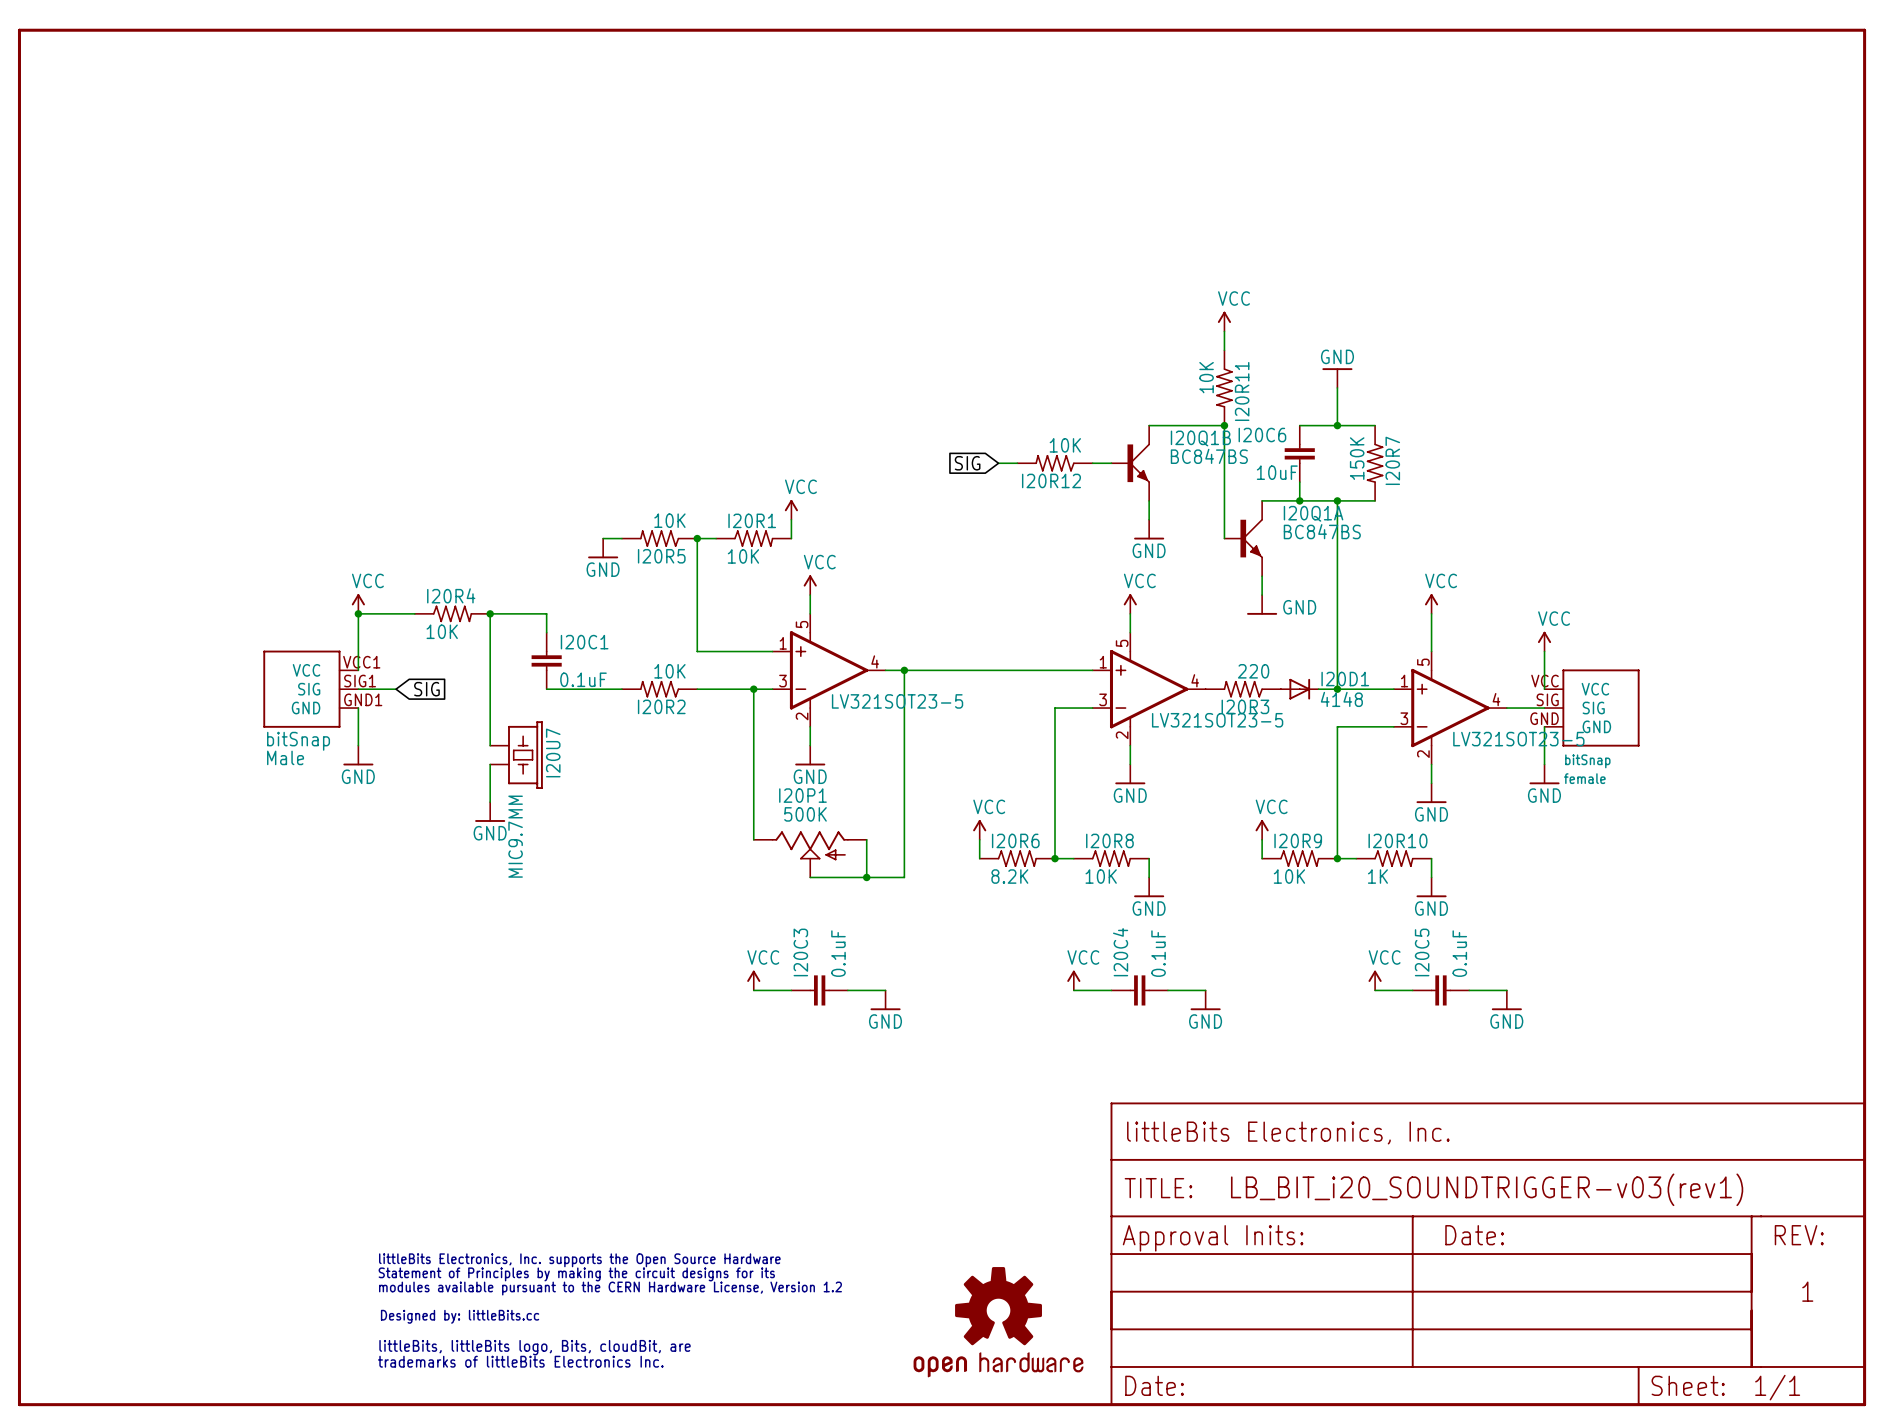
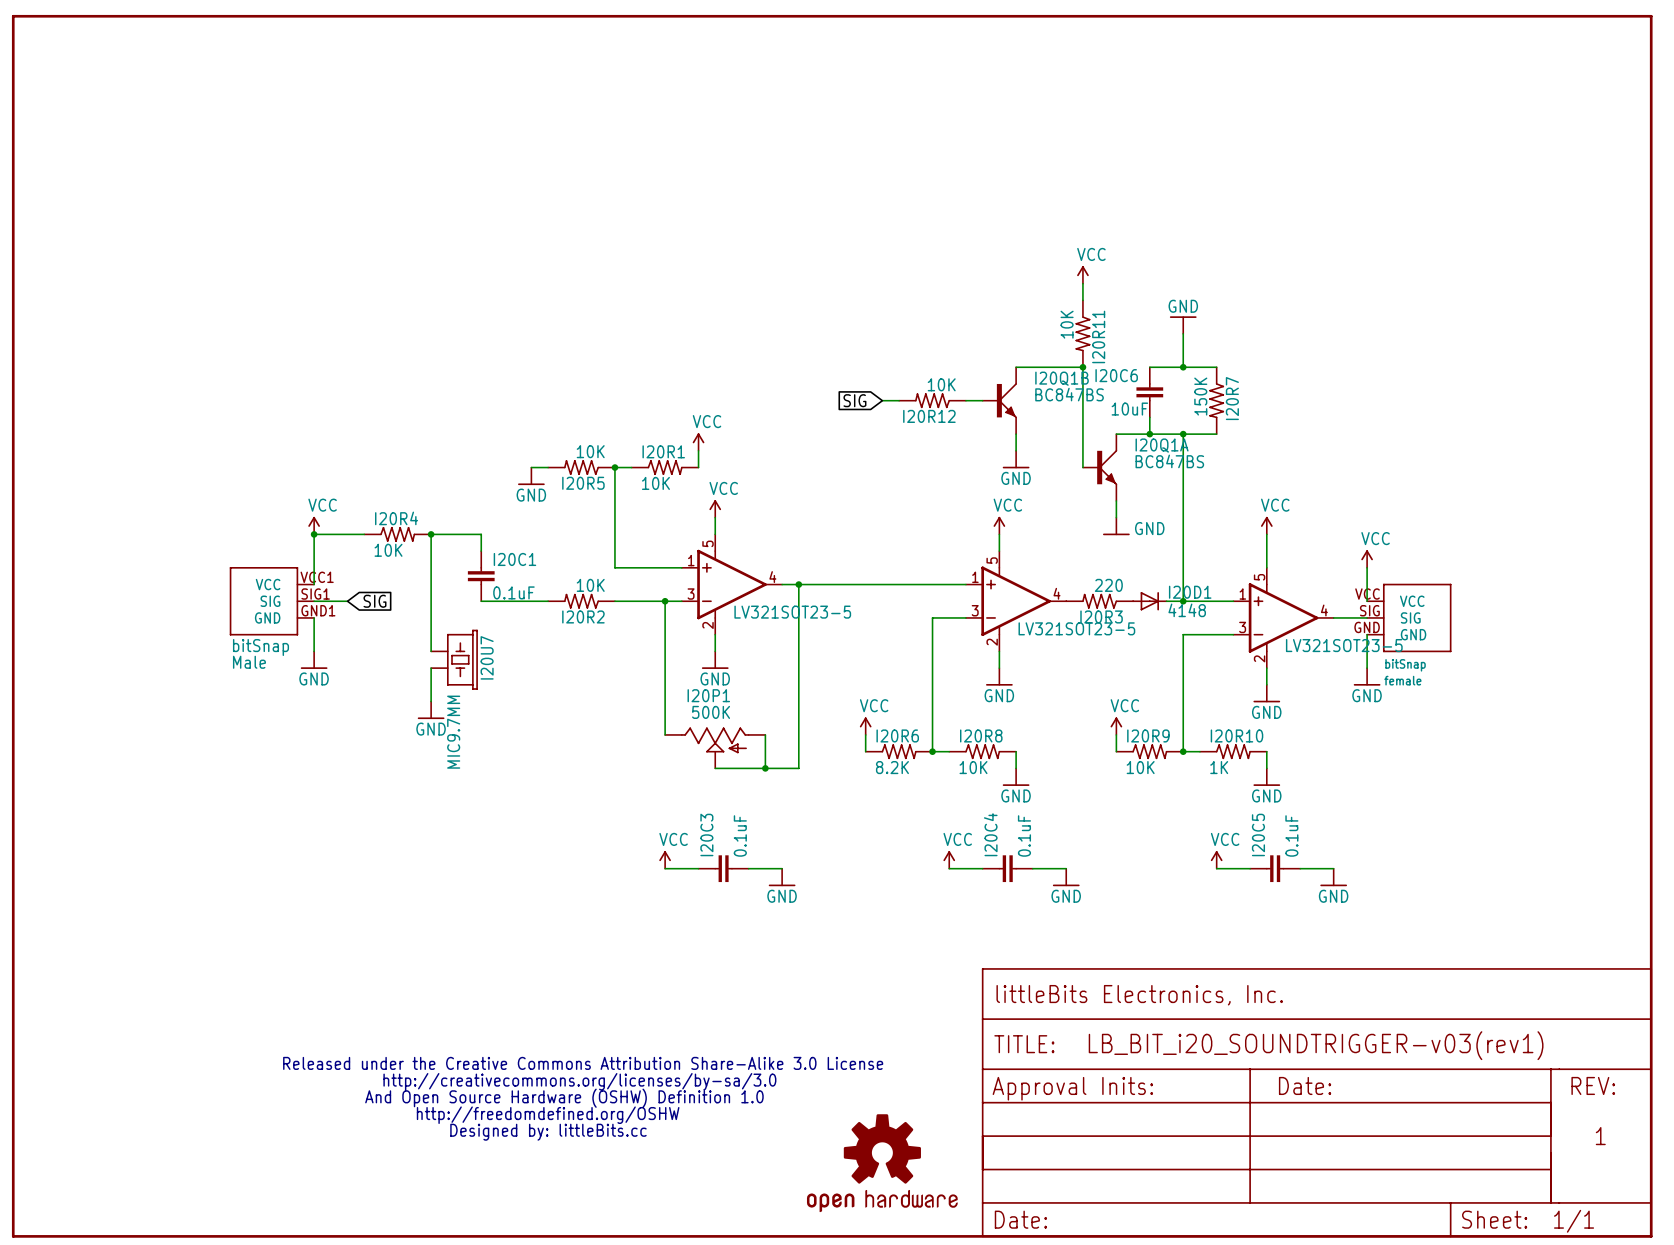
part: none -> (583, 1098)
part: (609, 1310) -> none

